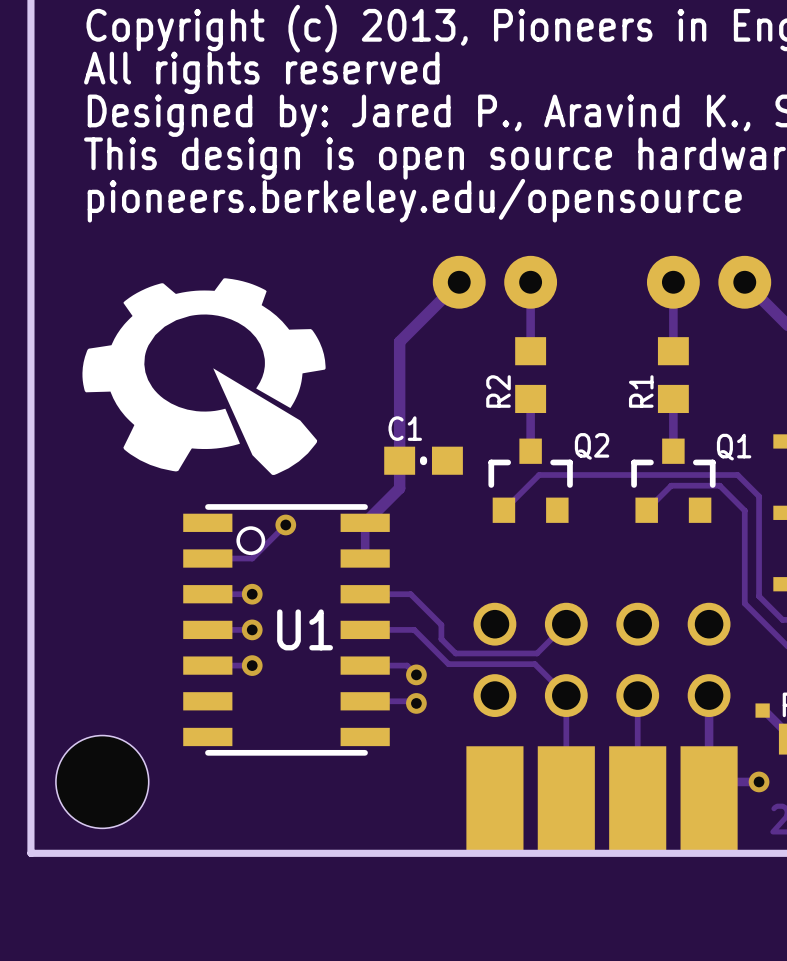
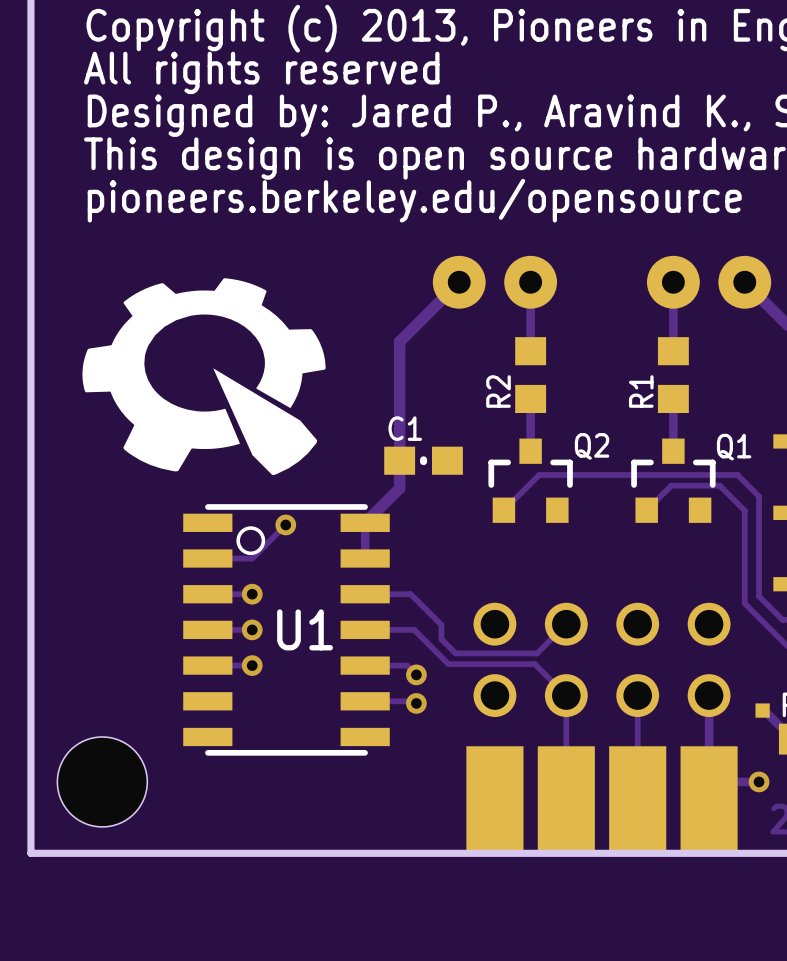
part: (102, 781) -> none
hole: none -> (102, 781)

